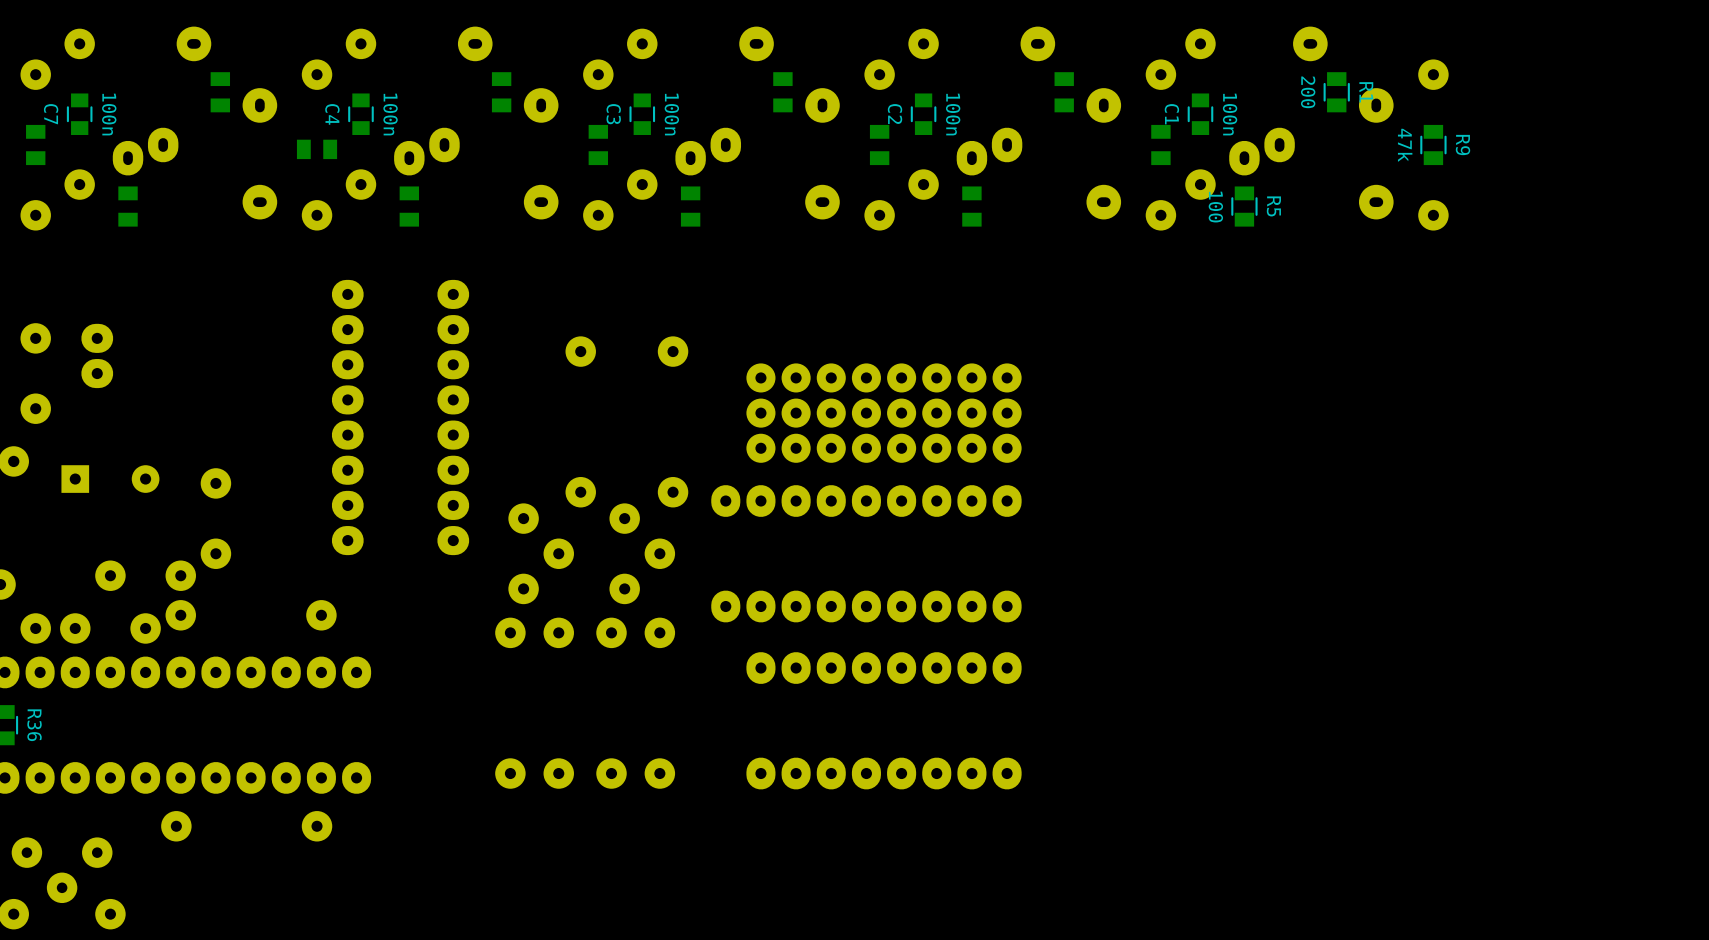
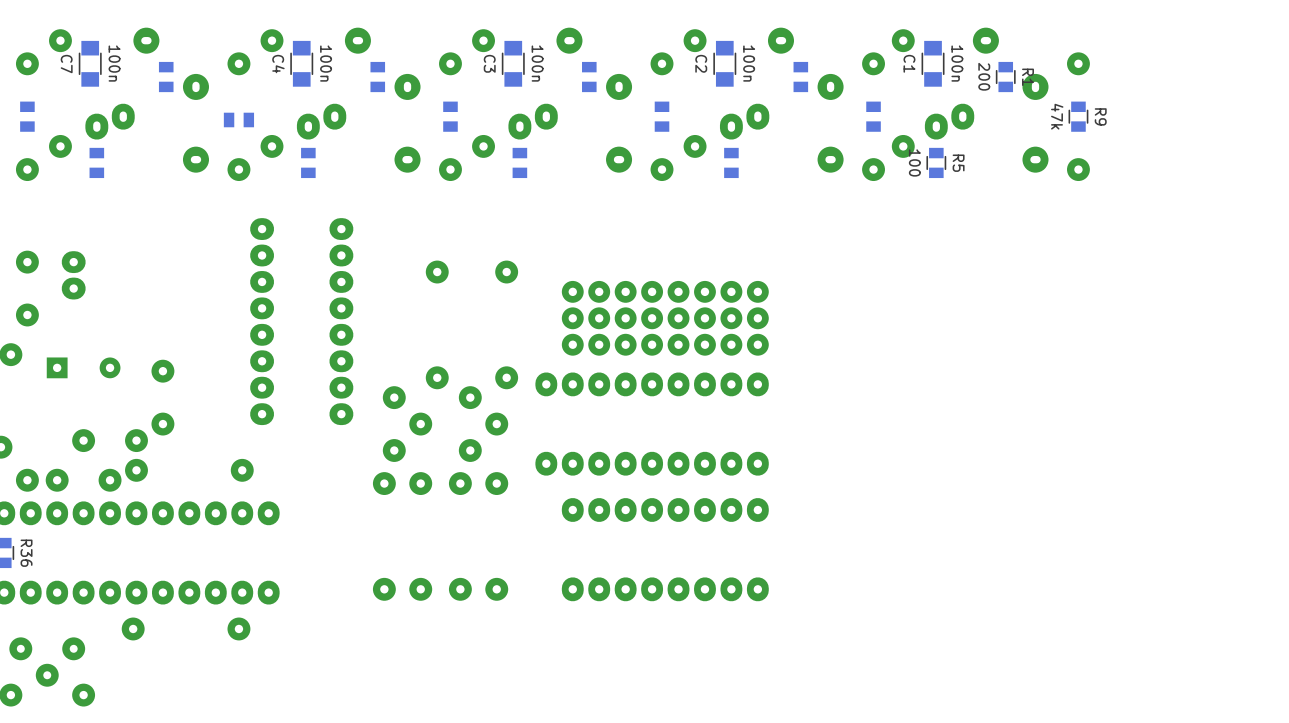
C7 footprint: [66, 93, 93, 135] -> [78, 40, 102, 87]
C4 footprint: [348, 93, 374, 135] -> [290, 40, 314, 87]
C3 footprint: [629, 93, 656, 135] -> [501, 40, 525, 87]
C2 footprint: [910, 93, 937, 135] -> [713, 40, 737, 87]
C1 footprint: [1187, 93, 1214, 135] -> [921, 40, 945, 87]

